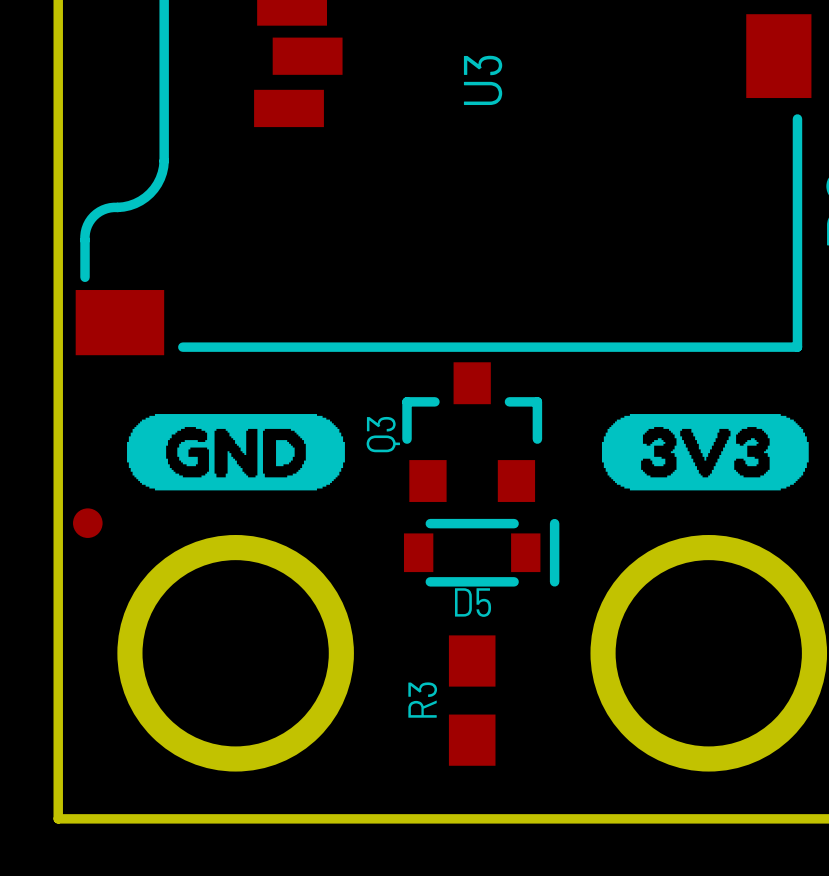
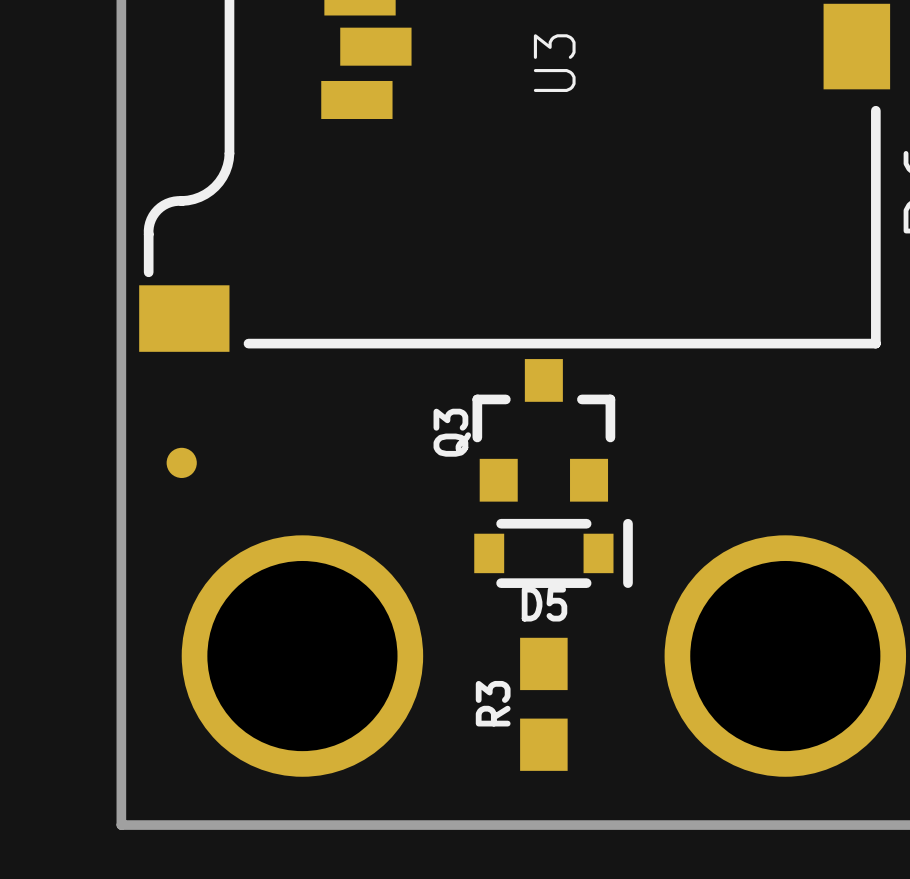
drawing: [127, 414, 345, 491] -> none
drawing: [601, 414, 809, 491] -> none
part position: (87, 523) -> (181, 462)

